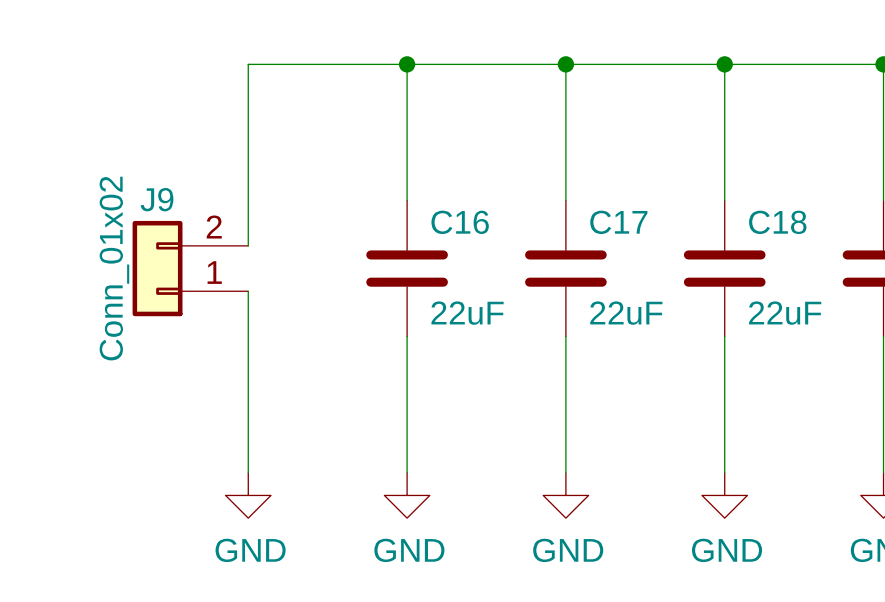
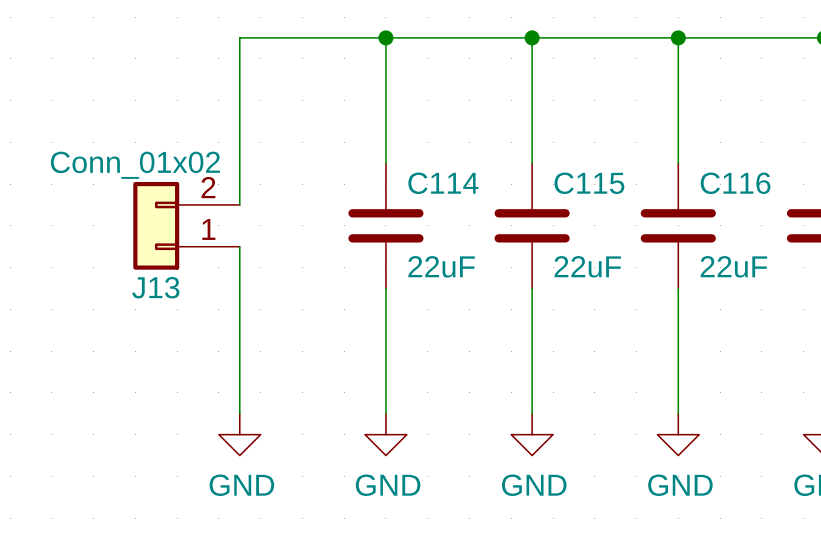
J9 name: J9 (157, 199) -> J13 (155, 287)
C16 name: C16 (460, 222) -> C114 (443, 183)
C17 name: C17 (618, 222) -> C115 (589, 183)
C18 name: C18 (777, 222) -> C116 (735, 183)
J9 value rotation: 0° (114, 268) -> 90° clockwise (135, 165)

